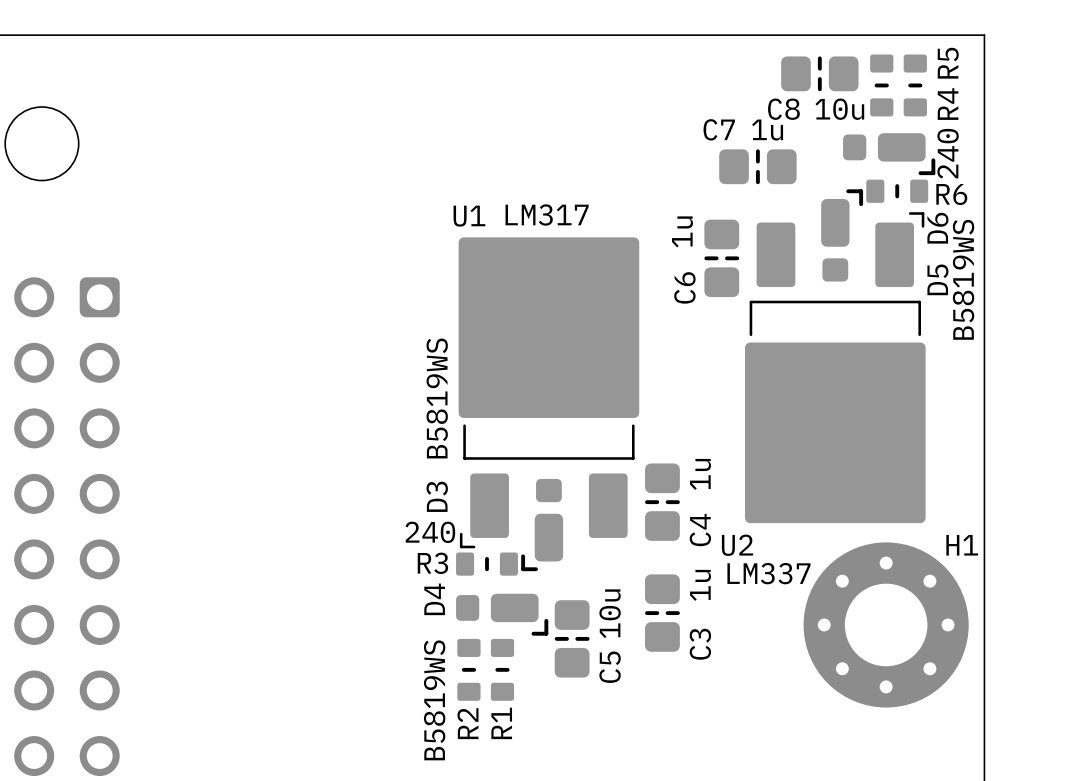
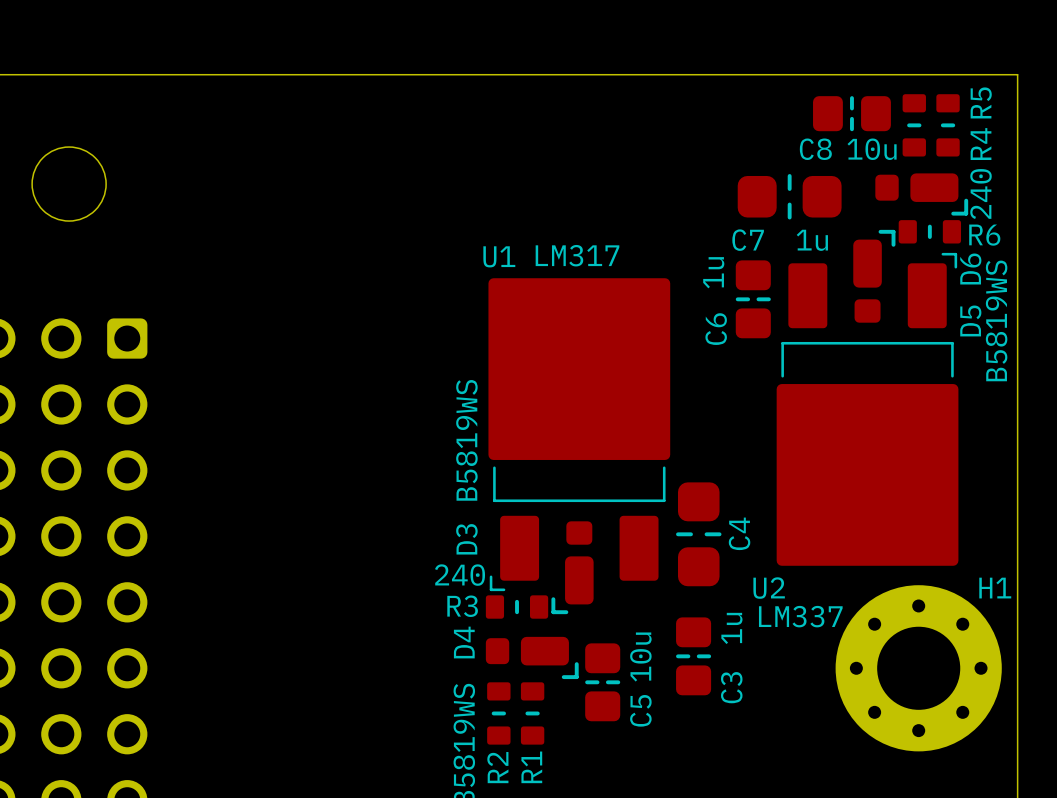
C7 name position: C7 (719, 129) -> C7 (748, 240)
C7 value position: 1u (767, 130) -> 1u (812, 240)
C7 footprint: [719, 149, 797, 185] -> [737, 174, 842, 220]
C4 footprint: [645, 463, 680, 541] -> [676, 482, 722, 587]
C4 value: 1u (700, 474) -> none
C4 name position: C4 (700, 530) -> C4 (739, 533)

